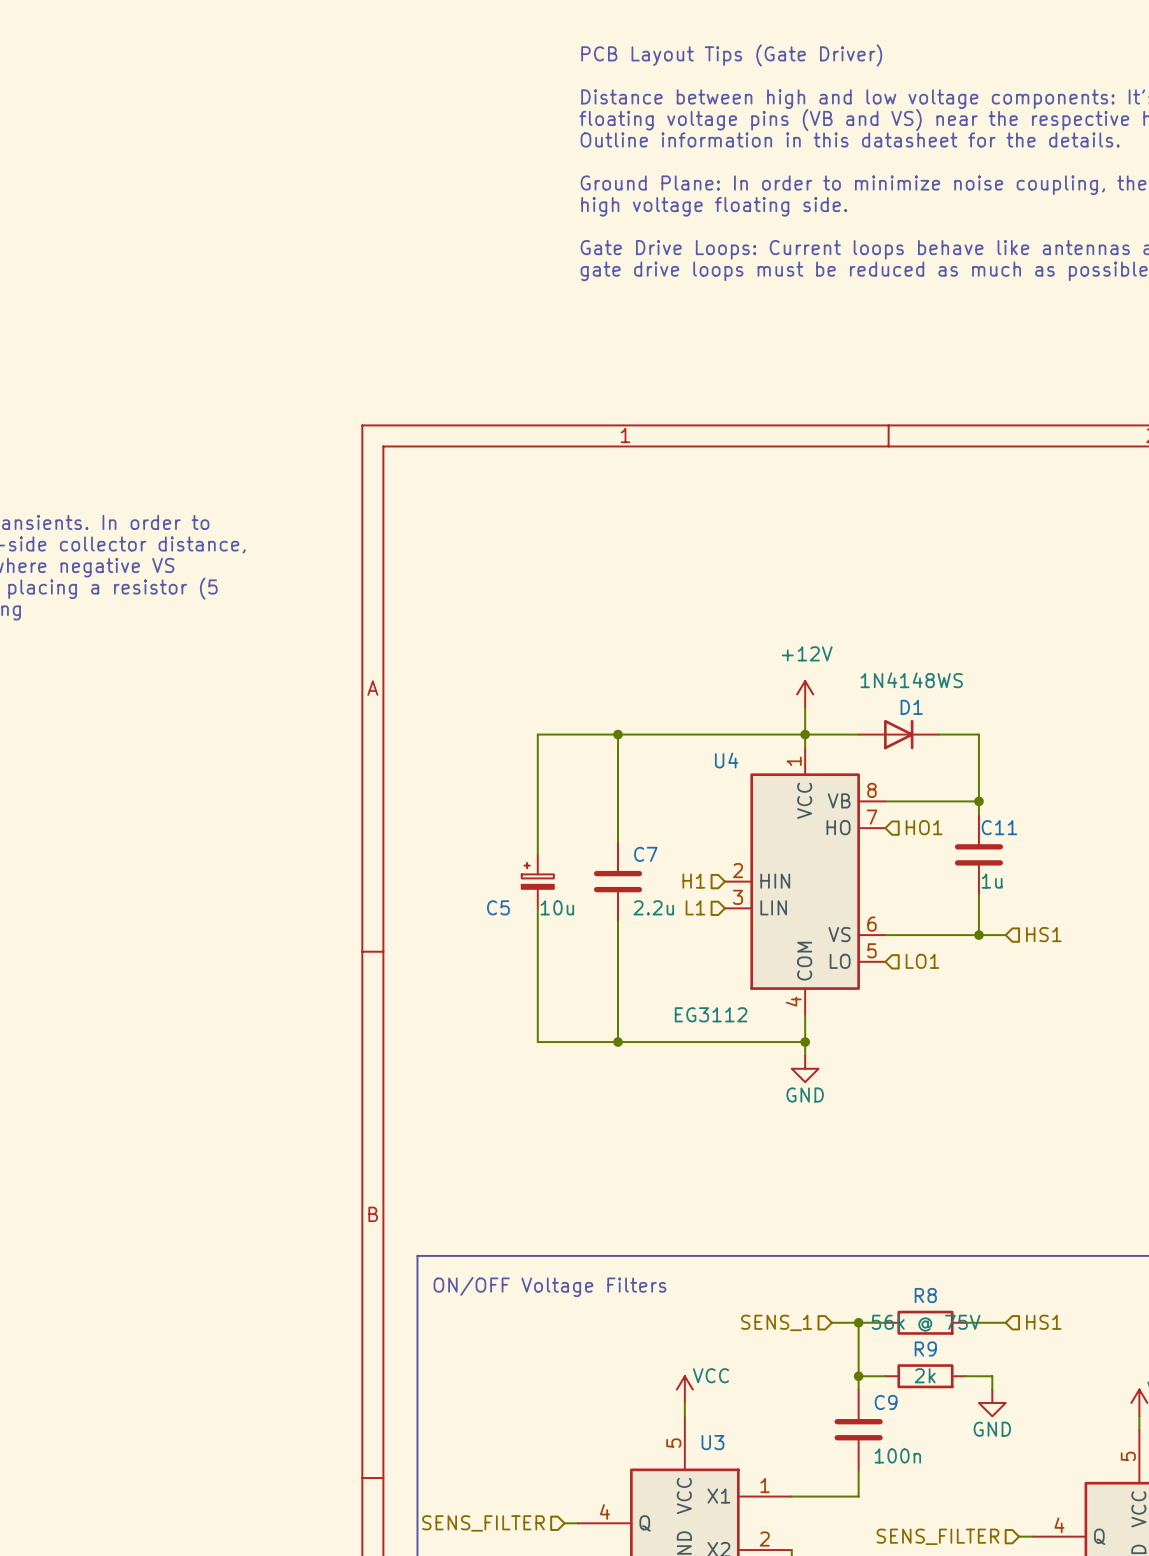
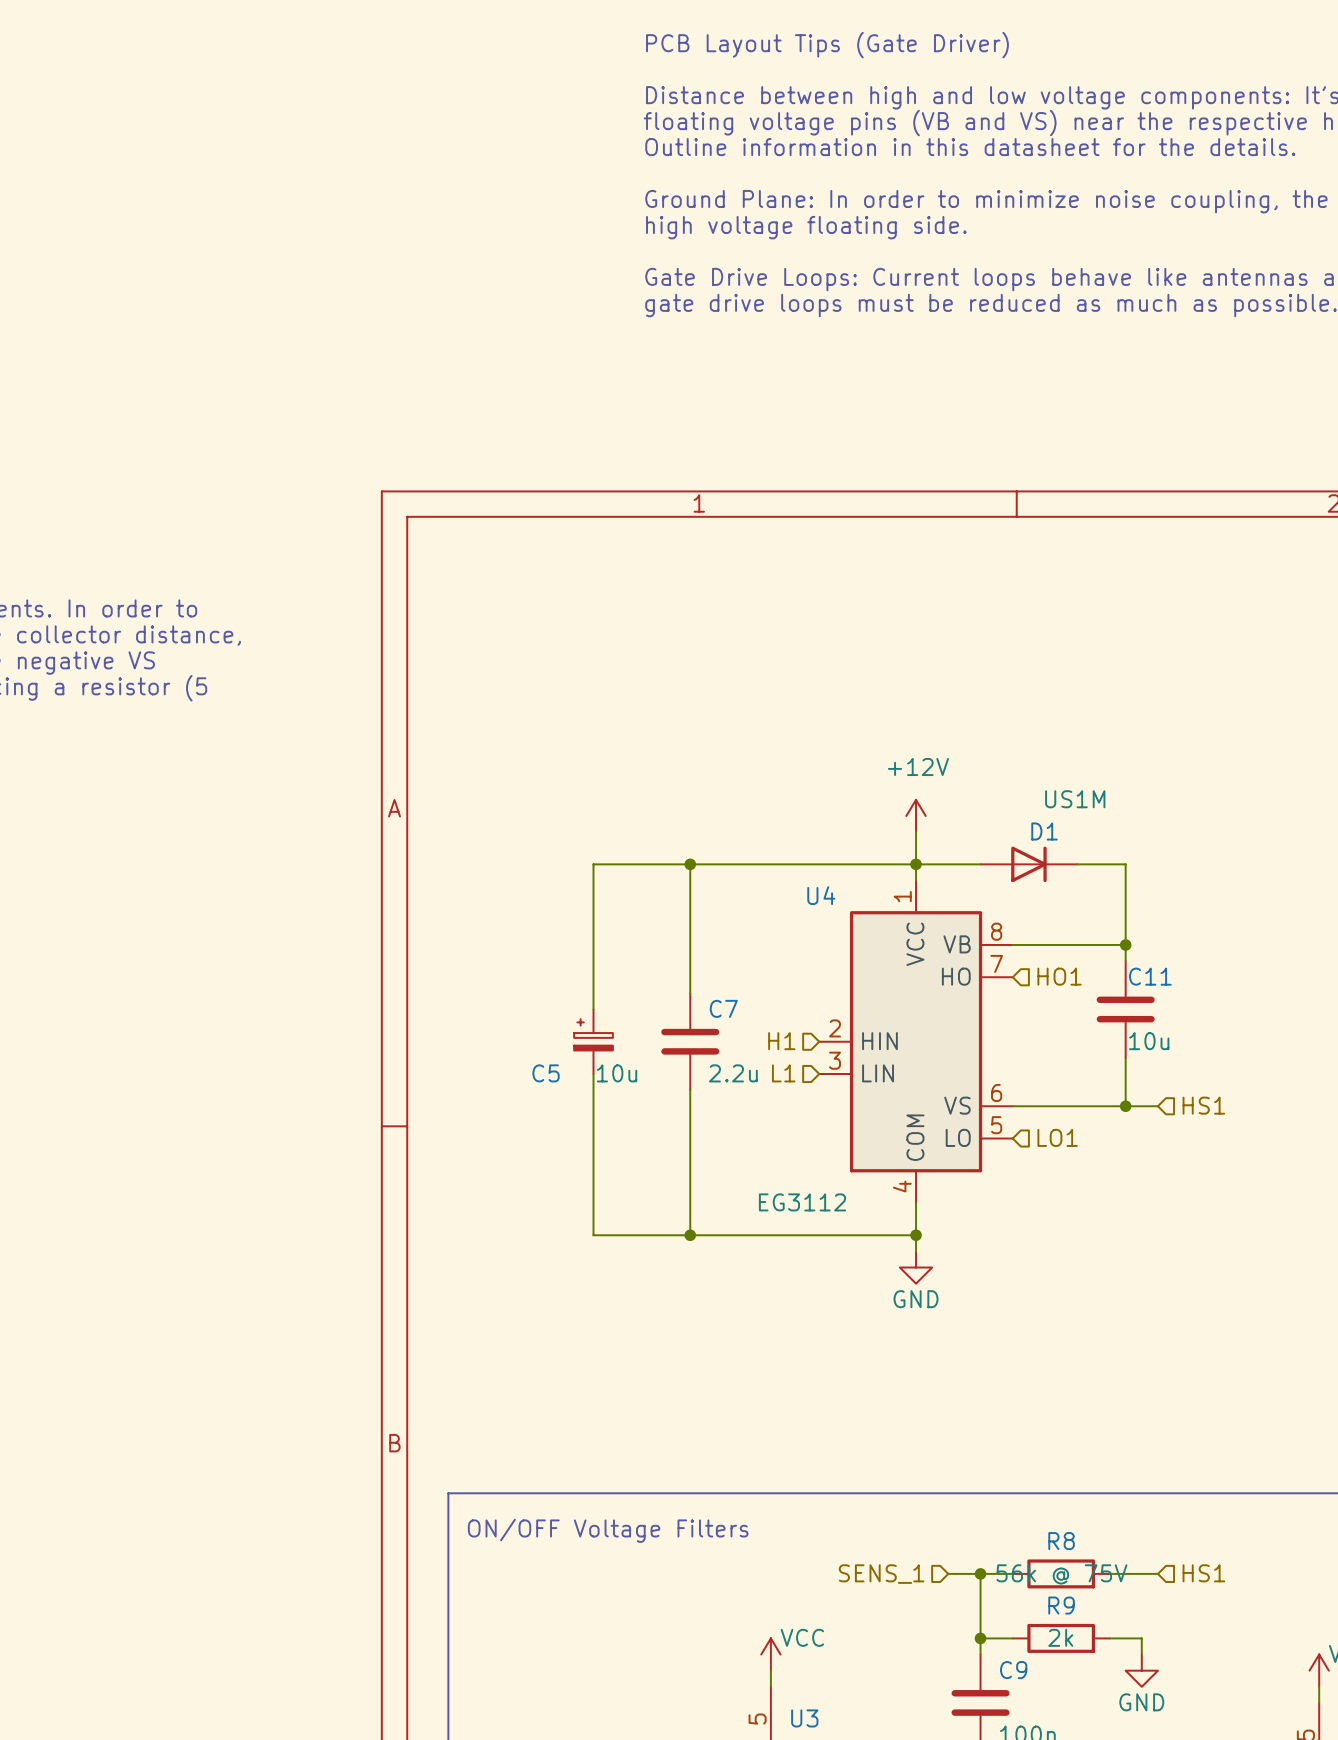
D1 value: 1N4148WS (911, 680) -> US1M (1075, 799)
C11 value: 1u (992, 881) -> 10u (1149, 1041)

